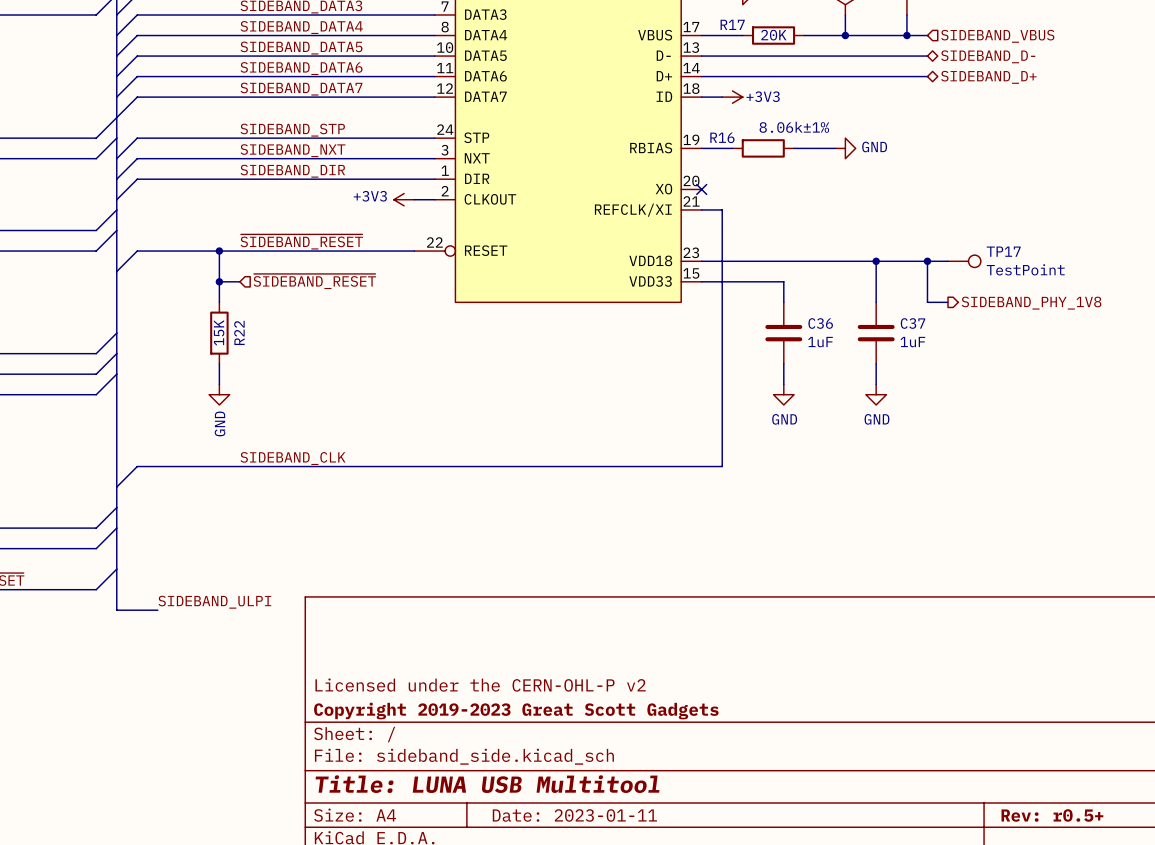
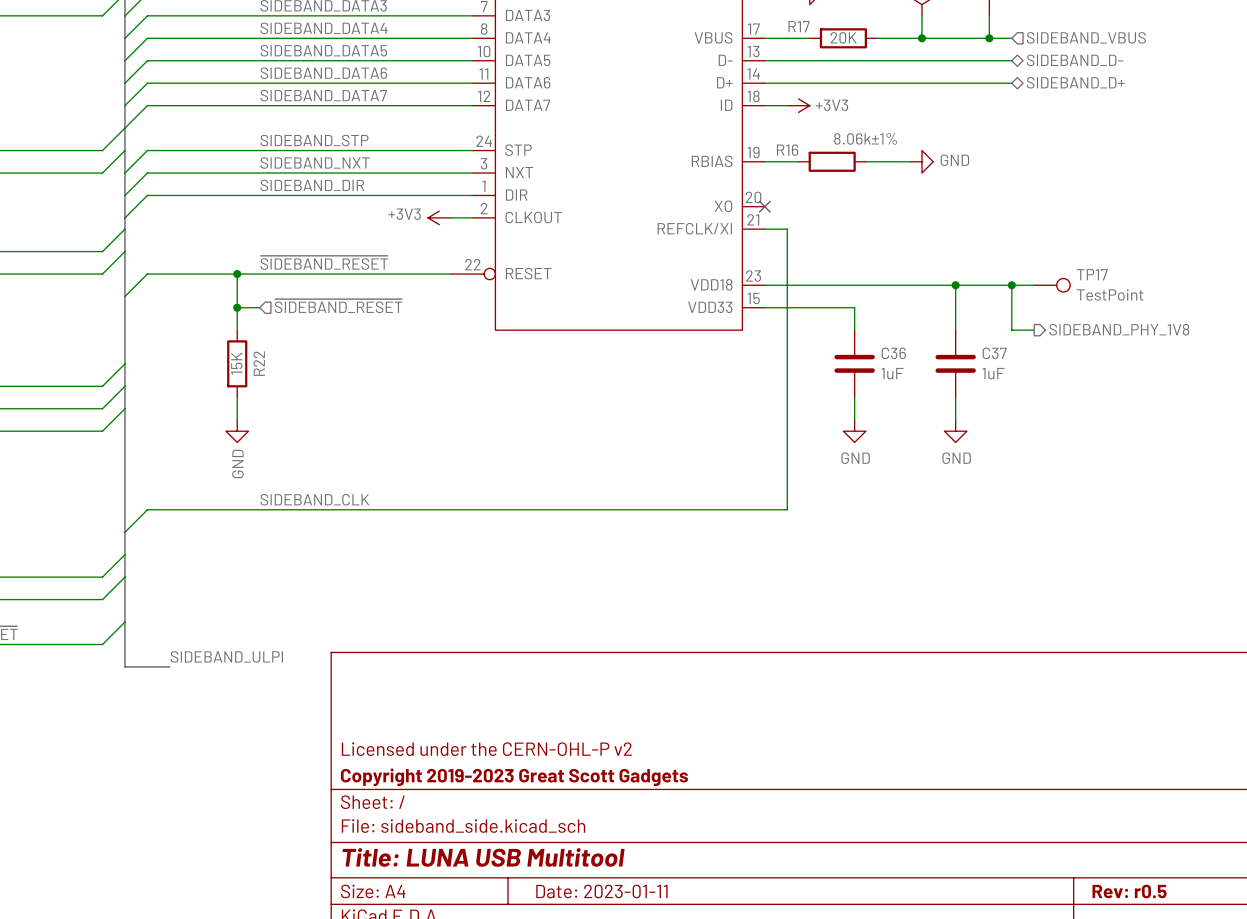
title block: Rev: r0.5+ (1052, 815) -> Rev: r0.5 (1129, 891)

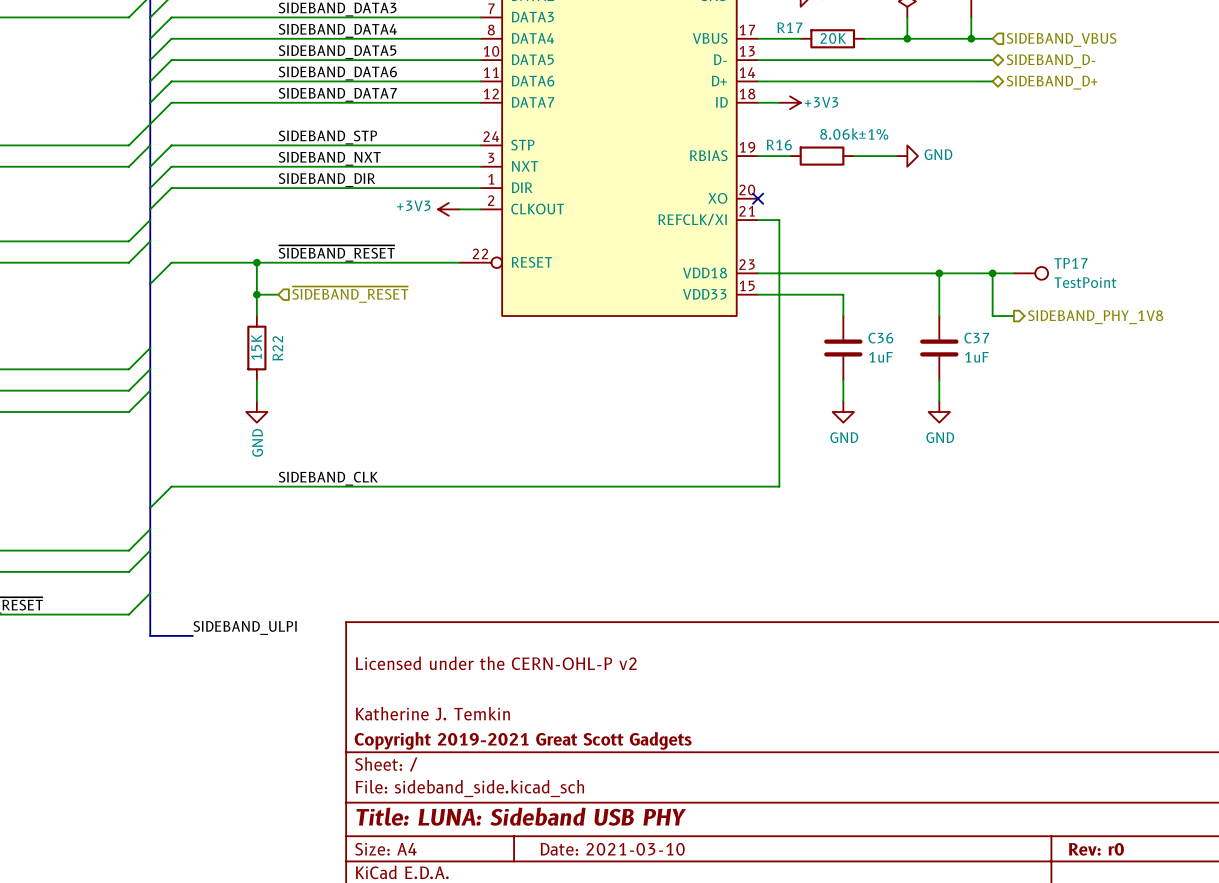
title block: none -> Licensed under the CERN-OHL-P v2 (496, 663)
title block: Licensed under the CERN-OHL-P v2 (486, 749) -> Katherine J. Temkin (432, 713)
title block: Copyright 2019-2023 Great Scott Gadgets (514, 777) -> Copyright 2019-2021 Great Scott Gadgets (523, 740)
title block: Title: LUNA USB Multitool (483, 857) -> Title: LUNA: Sideband USB PHY (521, 816)
title block: Date: 2023-01-11 (601, 891) -> Date: 2021-03-10 (612, 849)
title block: Rev: r0.5 (1129, 891) -> Rev: r0 (1096, 849)

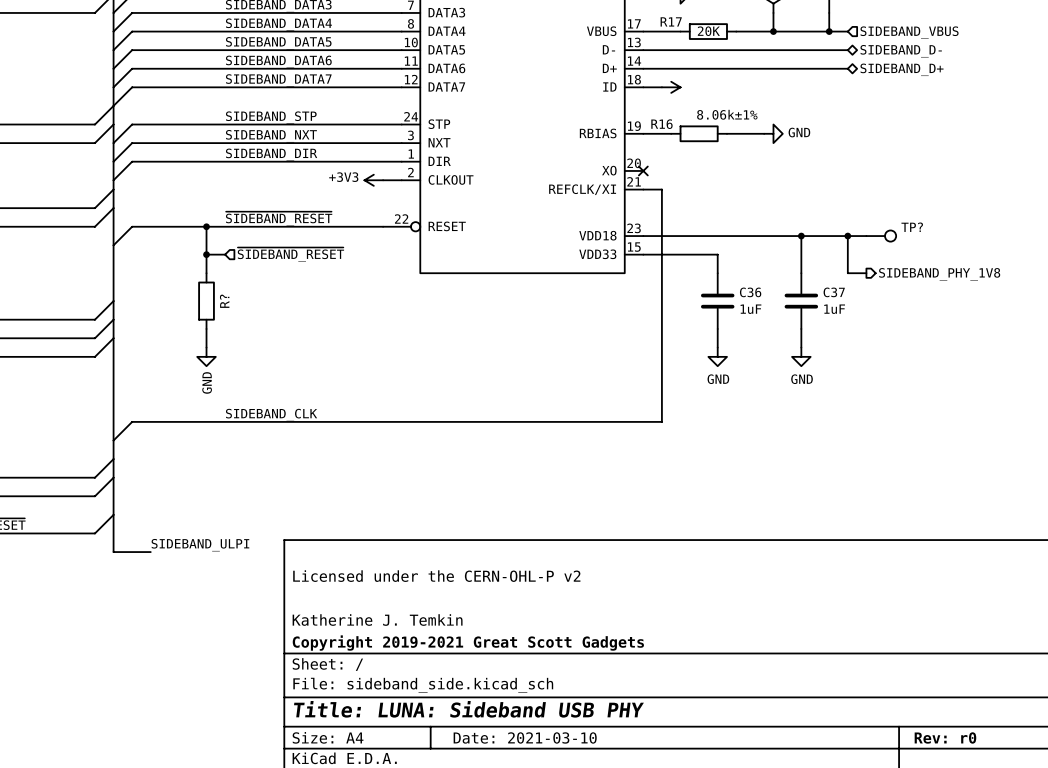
power symbol text: +3V3 (821, 102) -> none
TP17 name: TP17 (1070, 263) -> TP? (912, 227)
TP17 value: TestPoint (1085, 282) -> none
R22 value: 15K (256, 347) -> none
R22 name: R22 (277, 348) -> R? (224, 301)

